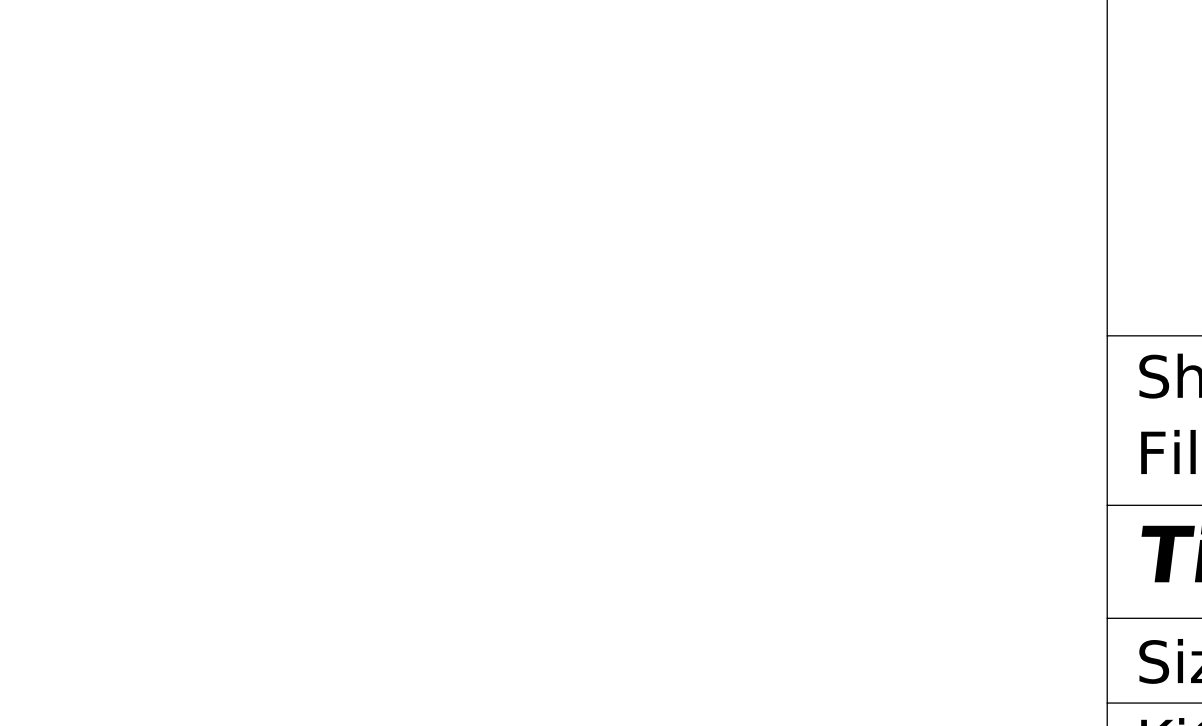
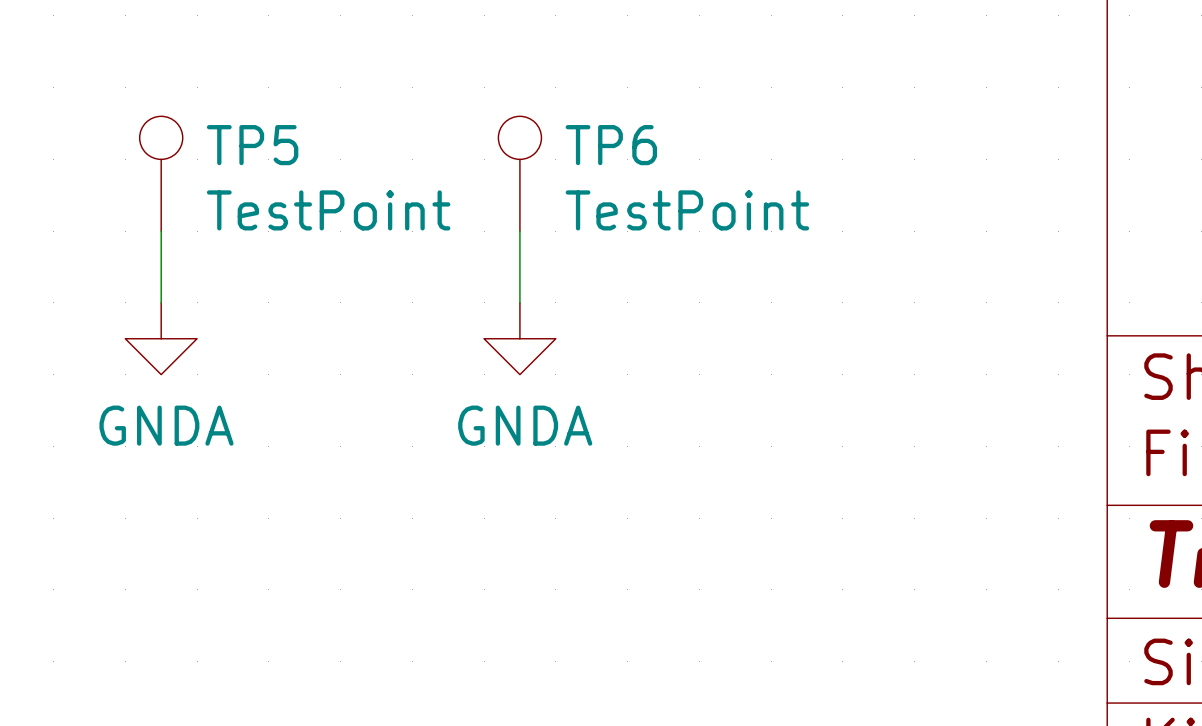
TP5: none -> TestPoint (161, 173)
TP6: none -> TestPoint (519, 173)
wire: none -> (161, 231) (161, 302)
wire: none -> (519, 231) (519, 302)
power symbol: none -> GNDA (161, 338)
power symbol: none -> GNDA (519, 338)

